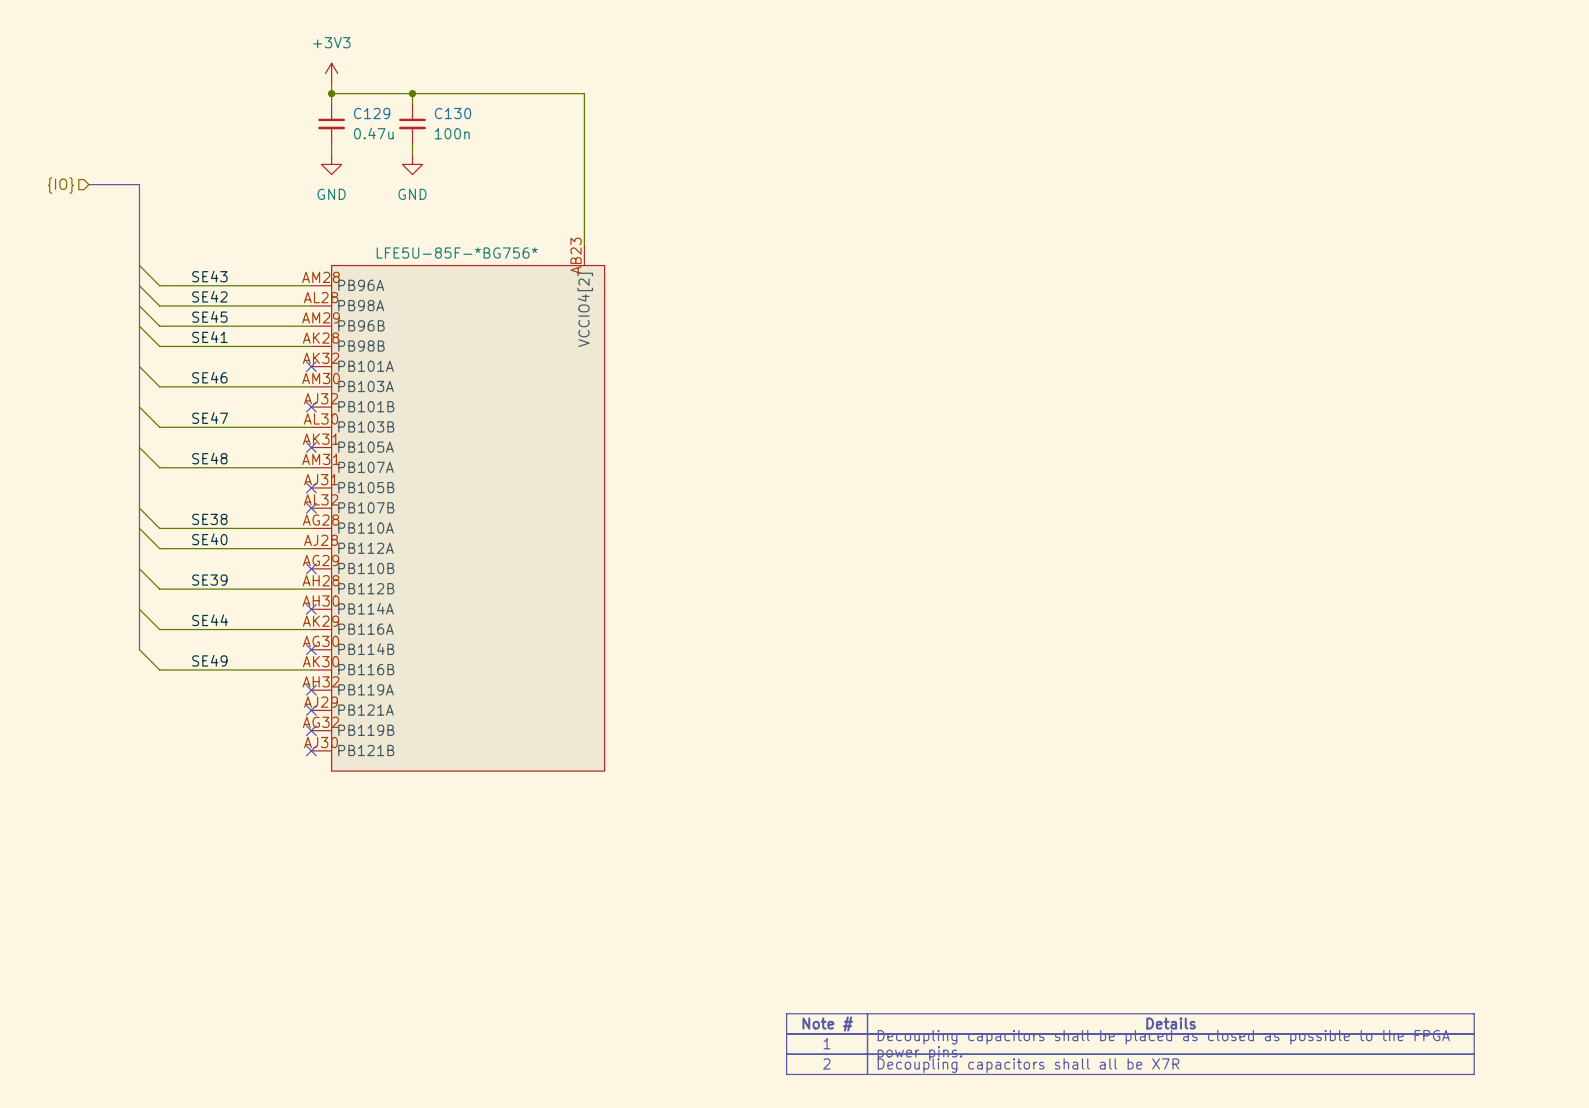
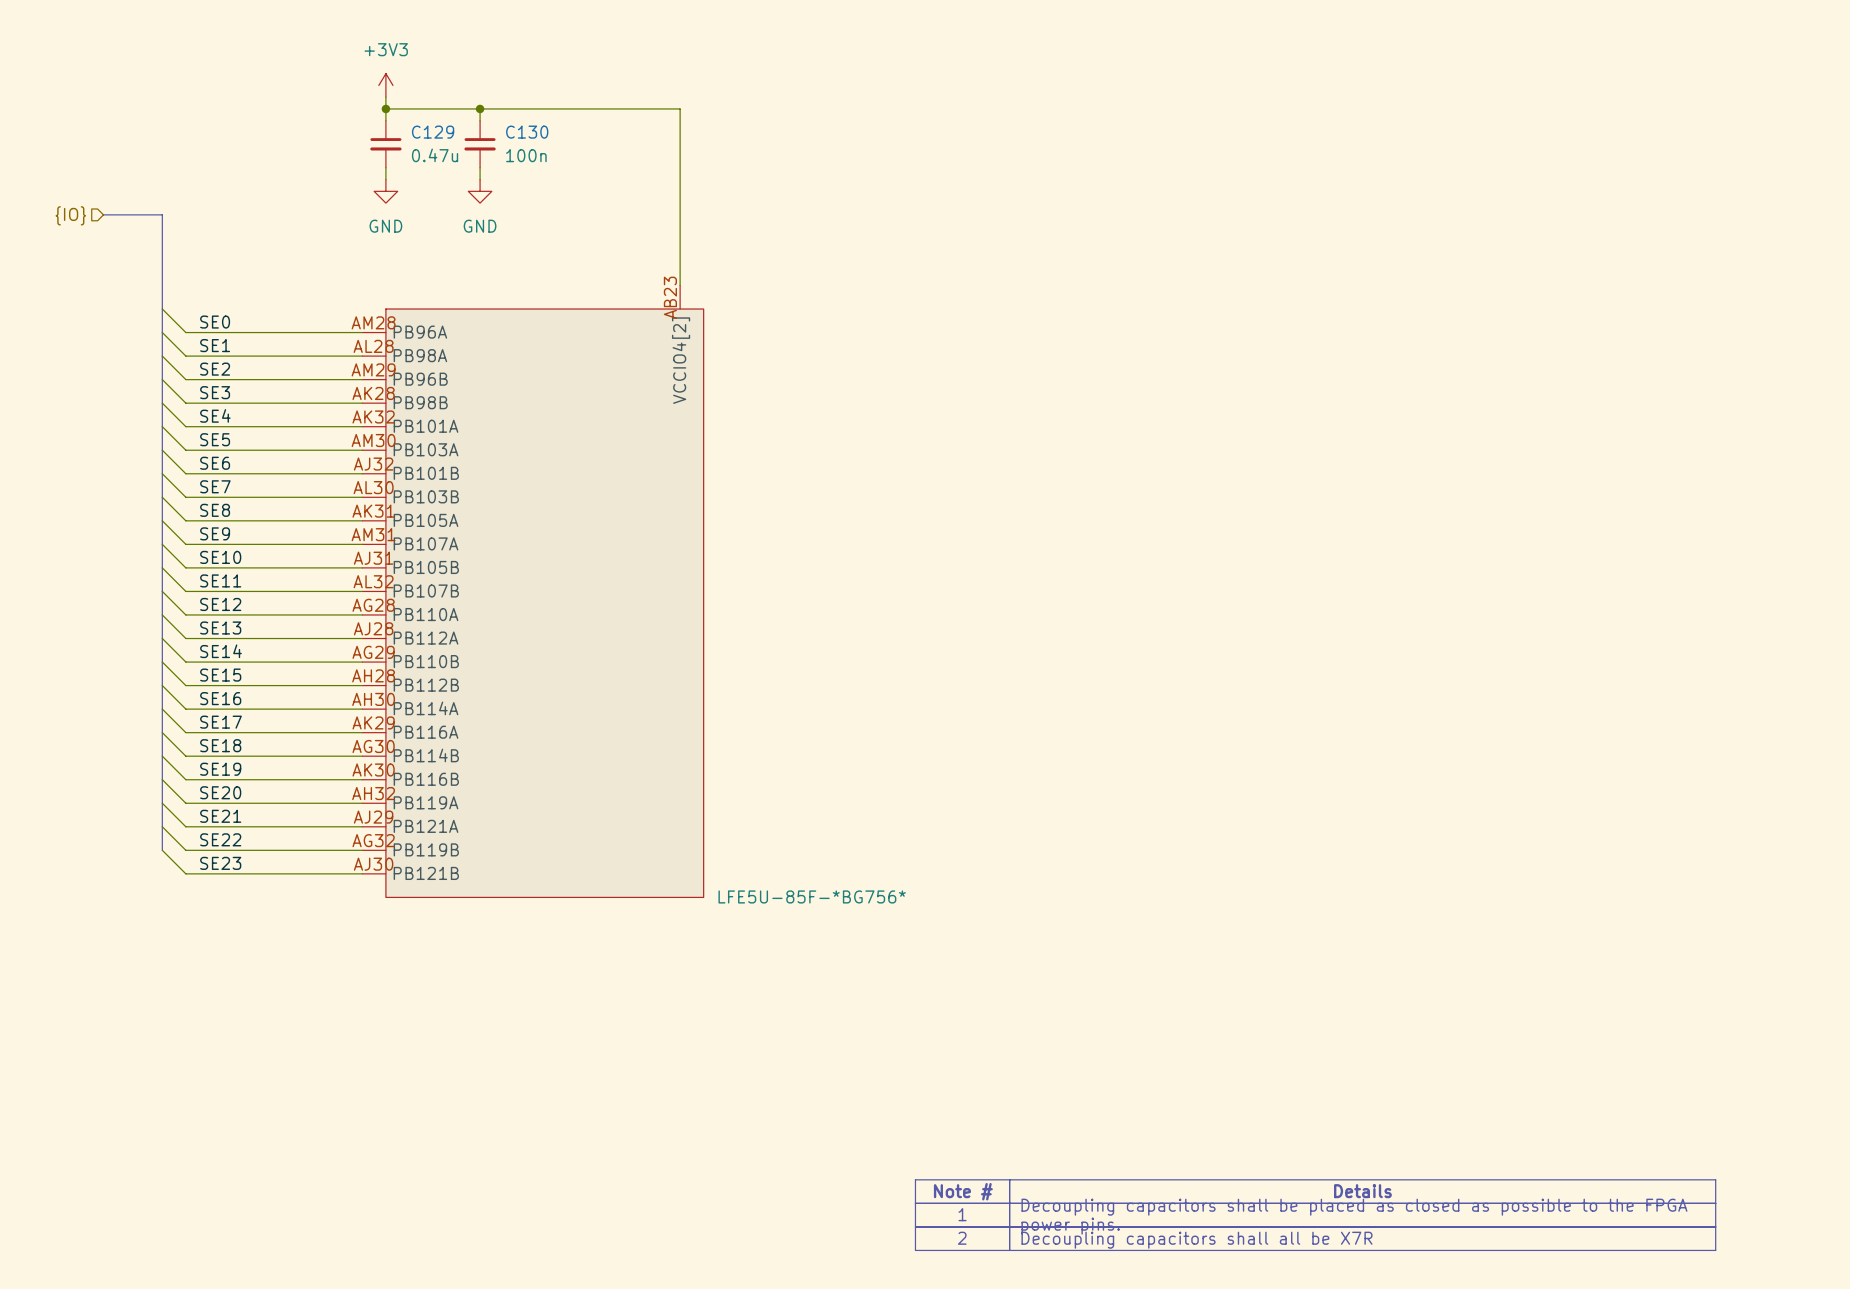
part value position: LFE5U-85F-*BG756* (457, 253) -> LFE5U-85F-*BG756* (812, 896)
label: none -> SE0 (215, 322)
label: SE43 (209, 276) -> none
label: none -> SE1 (215, 345)
label: SE42 (209, 296) -> SE2 (215, 369)
label: SE45 (209, 316) -> none
label: none -> SE3 (215, 392)
label: SE41 (209, 337) -> none
wire: none -> (162, 403) (185, 426) (362, 426)
label: none -> SE4 (215, 415)
no-connect mark: (311, 366) -> none
label: none -> SE5 (215, 439)
label: SE46 (209, 377) -> none
wire: none -> (162, 450) (185, 473) (362, 473)
label: none -> SE6 (215, 463)
no-connect mark: (311, 407) -> none
label: SE47 (210, 418) -> SE7 (215, 486)
wire: none -> (162, 497) (185, 520) (362, 520)
no-connect mark: (311, 447) -> none
label: none -> SE9 (215, 533)
label: SE48 (209, 458) -> SE8 (215, 510)
wire: none -> (162, 544) (185, 567) (362, 567)
label: none -> SE10 (220, 557)
wire: none -> (162, 567) (185, 591) (362, 591)
no-connect mark: (311, 487) -> none
label: none -> SE11 (220, 580)
no-connect mark: (311, 508) -> none
label: none -> SE12 (220, 604)
label: SE38 (209, 519) -> SE13 (220, 628)
label: SE40 (209, 539) -> SE14 (220, 651)
wire: none -> (162, 638) (185, 662) (362, 662)
no-connect mark: (311, 568) -> none
label: none -> SE15 (220, 675)
label: SE39 (209, 580) -> none
wire: none -> (162, 685) (185, 709) (362, 709)
label: none -> SE16 (220, 698)
no-connect mark: (311, 609) -> none
label: none -> SE17 (220, 722)
label: SE44 (210, 620) -> none
wire: none -> (162, 732) (185, 756) (362, 756)
label: none -> SE18 (220, 745)
bus: none -> (162, 756) (162, 850)
no-connect mark: (311, 649) -> none
label: SE49 (209, 660) -> SE19 (220, 769)
wire: none -> (162, 779) (185, 803) (362, 803)
label: none -> SE20 (220, 792)
wire: none -> (162, 803) (185, 826) (362, 826)
no-connect mark: (311, 690) -> none
label: none -> SE21 (220, 816)
wire: none -> (162, 826) (185, 850) (362, 850)
no-connect mark: (311, 710) -> none
label: none -> SE22 (220, 839)
wire: none -> (162, 850) (185, 873) (362, 873)
no-connect mark: (311, 730) -> none
label: none -> SE23 (220, 863)
no-connect mark: (311, 750) -> none

